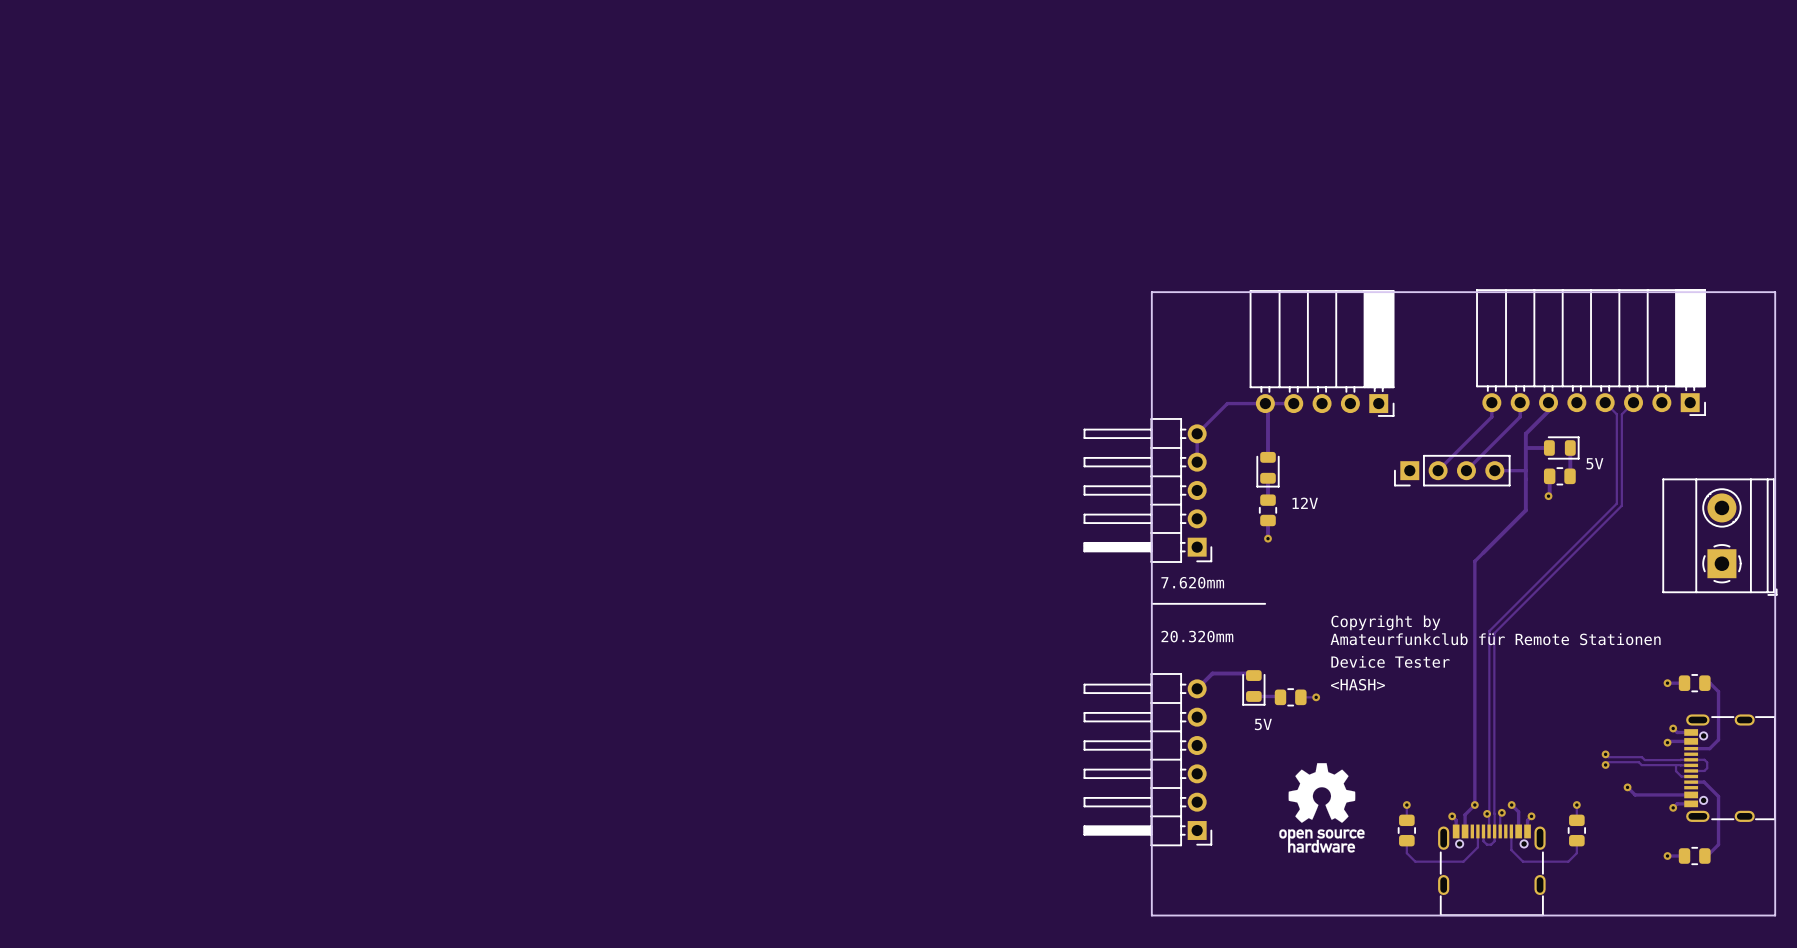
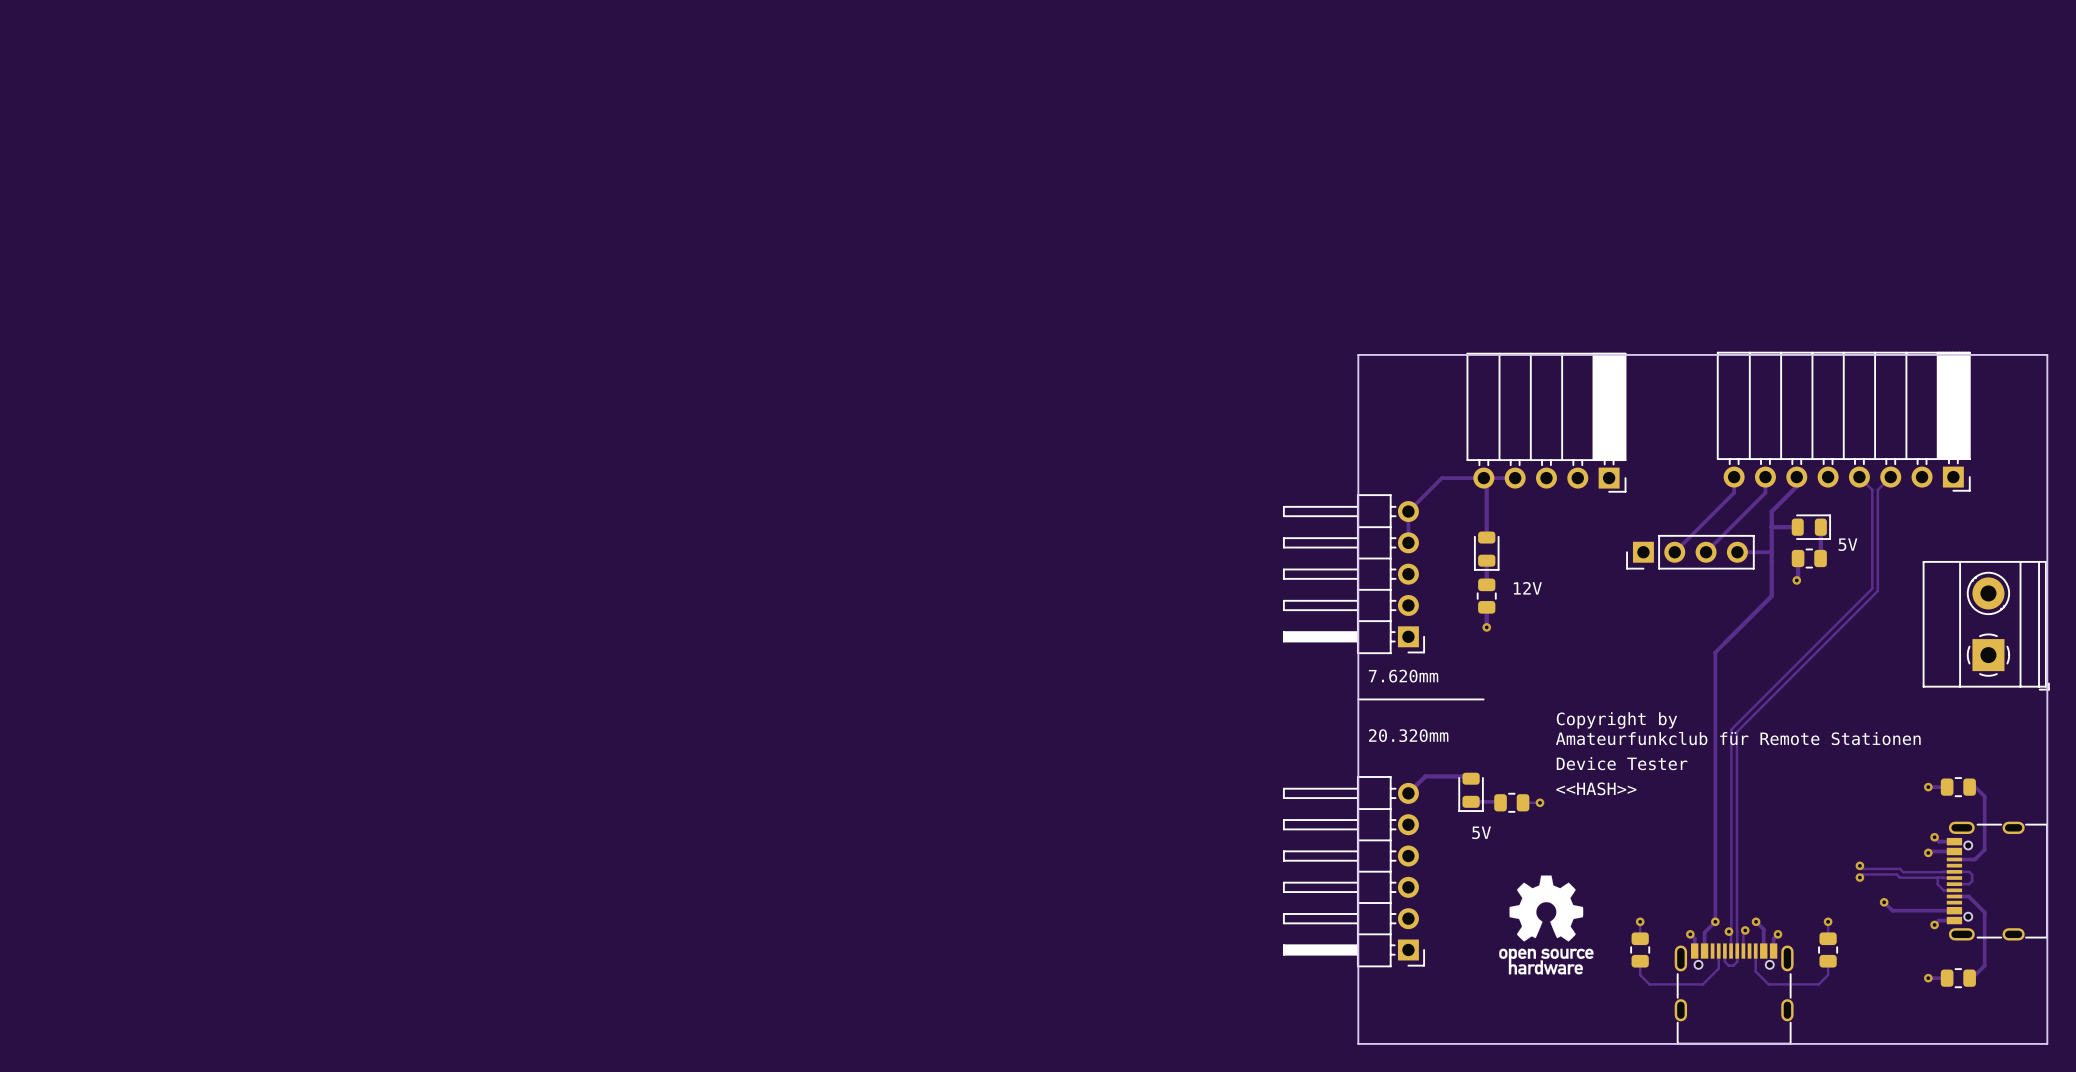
text: <HASH> (1357, 684) -> <<HASH>> (1596, 788)

